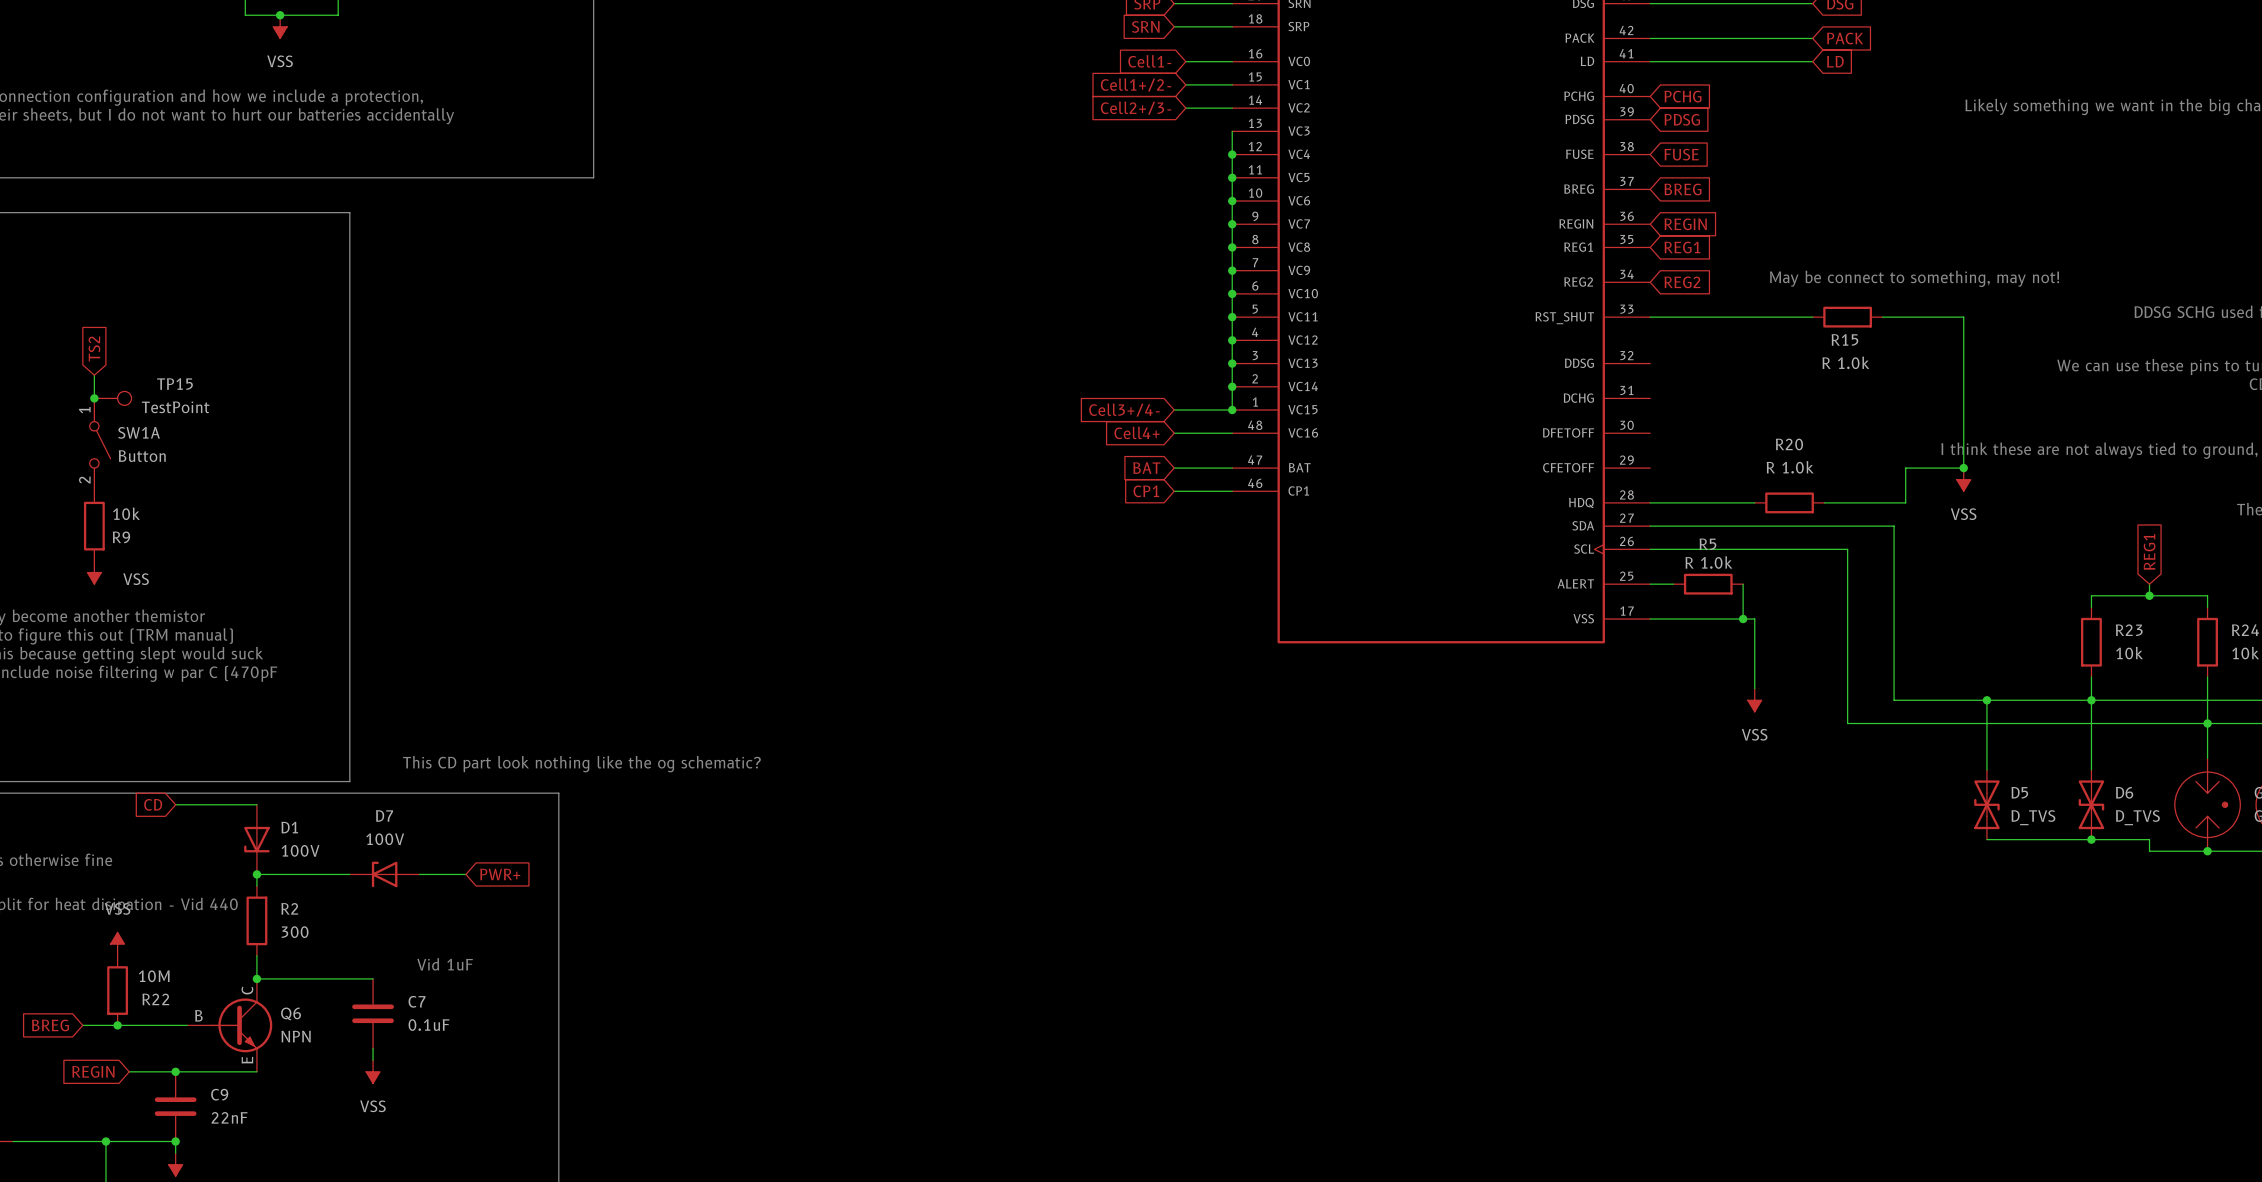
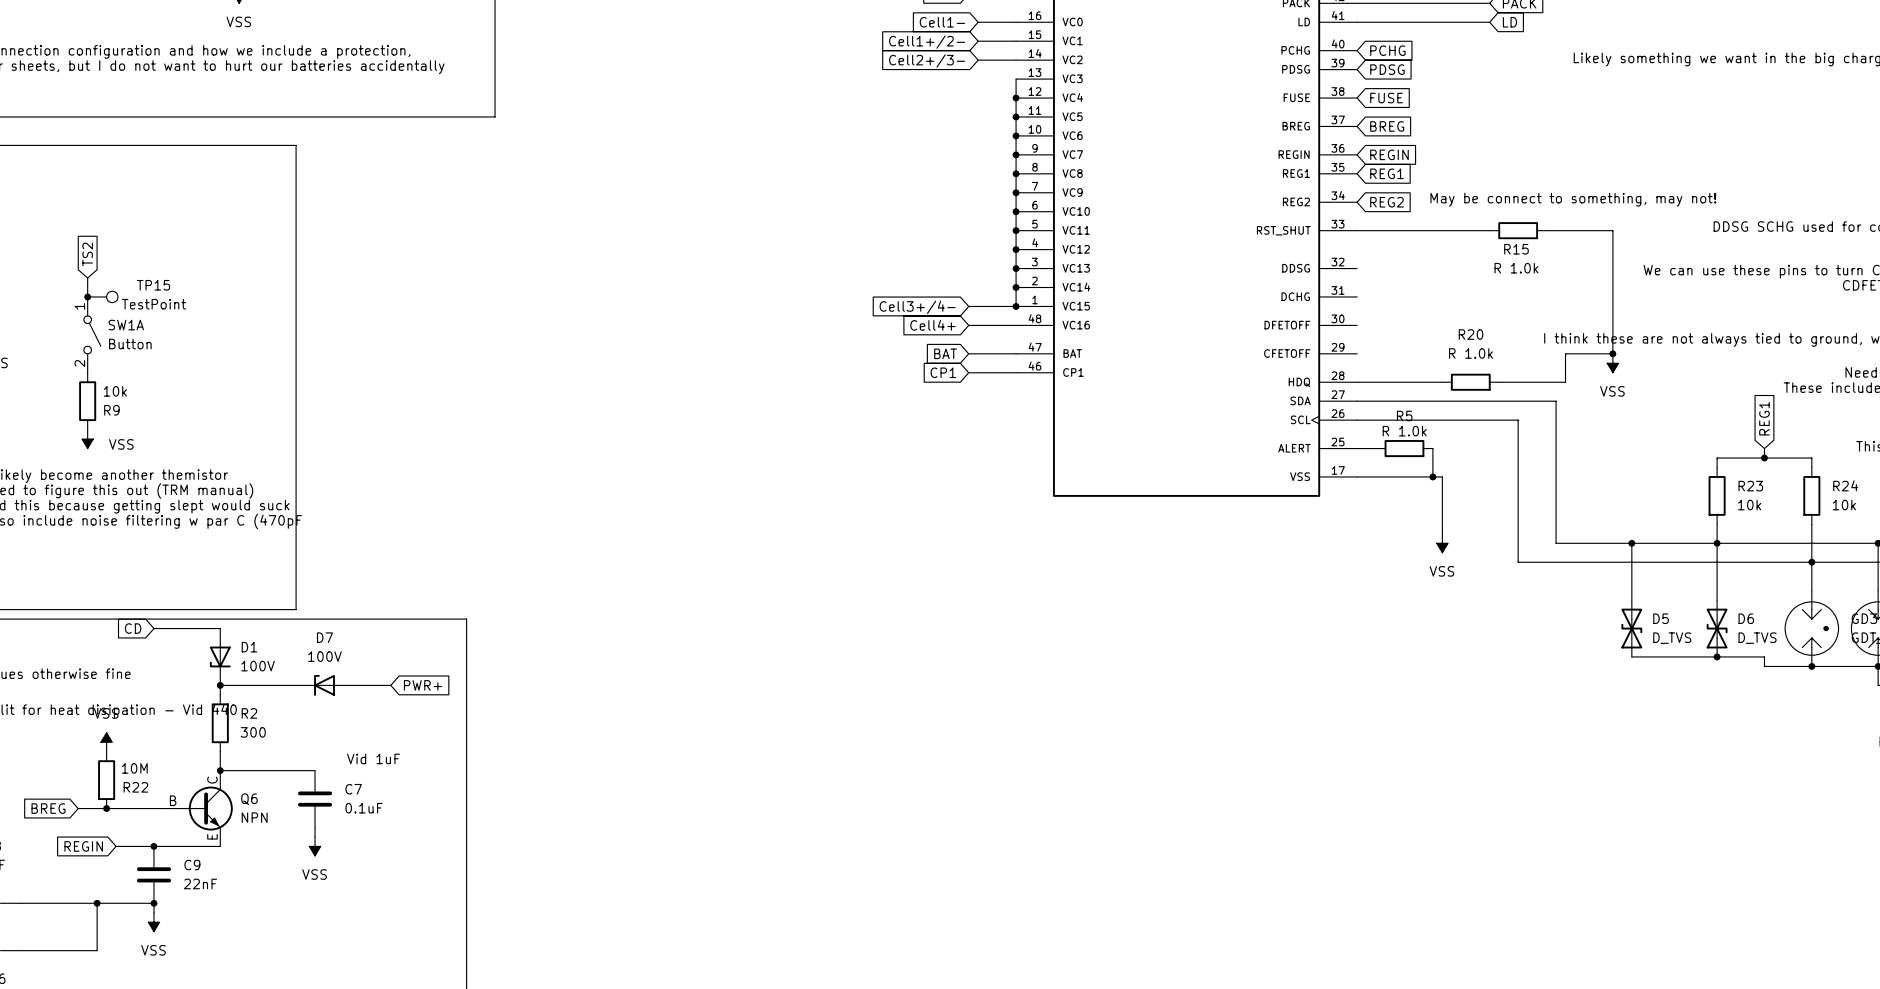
text: This CD part look nothing like the og schematic? (581, 764) -> none

